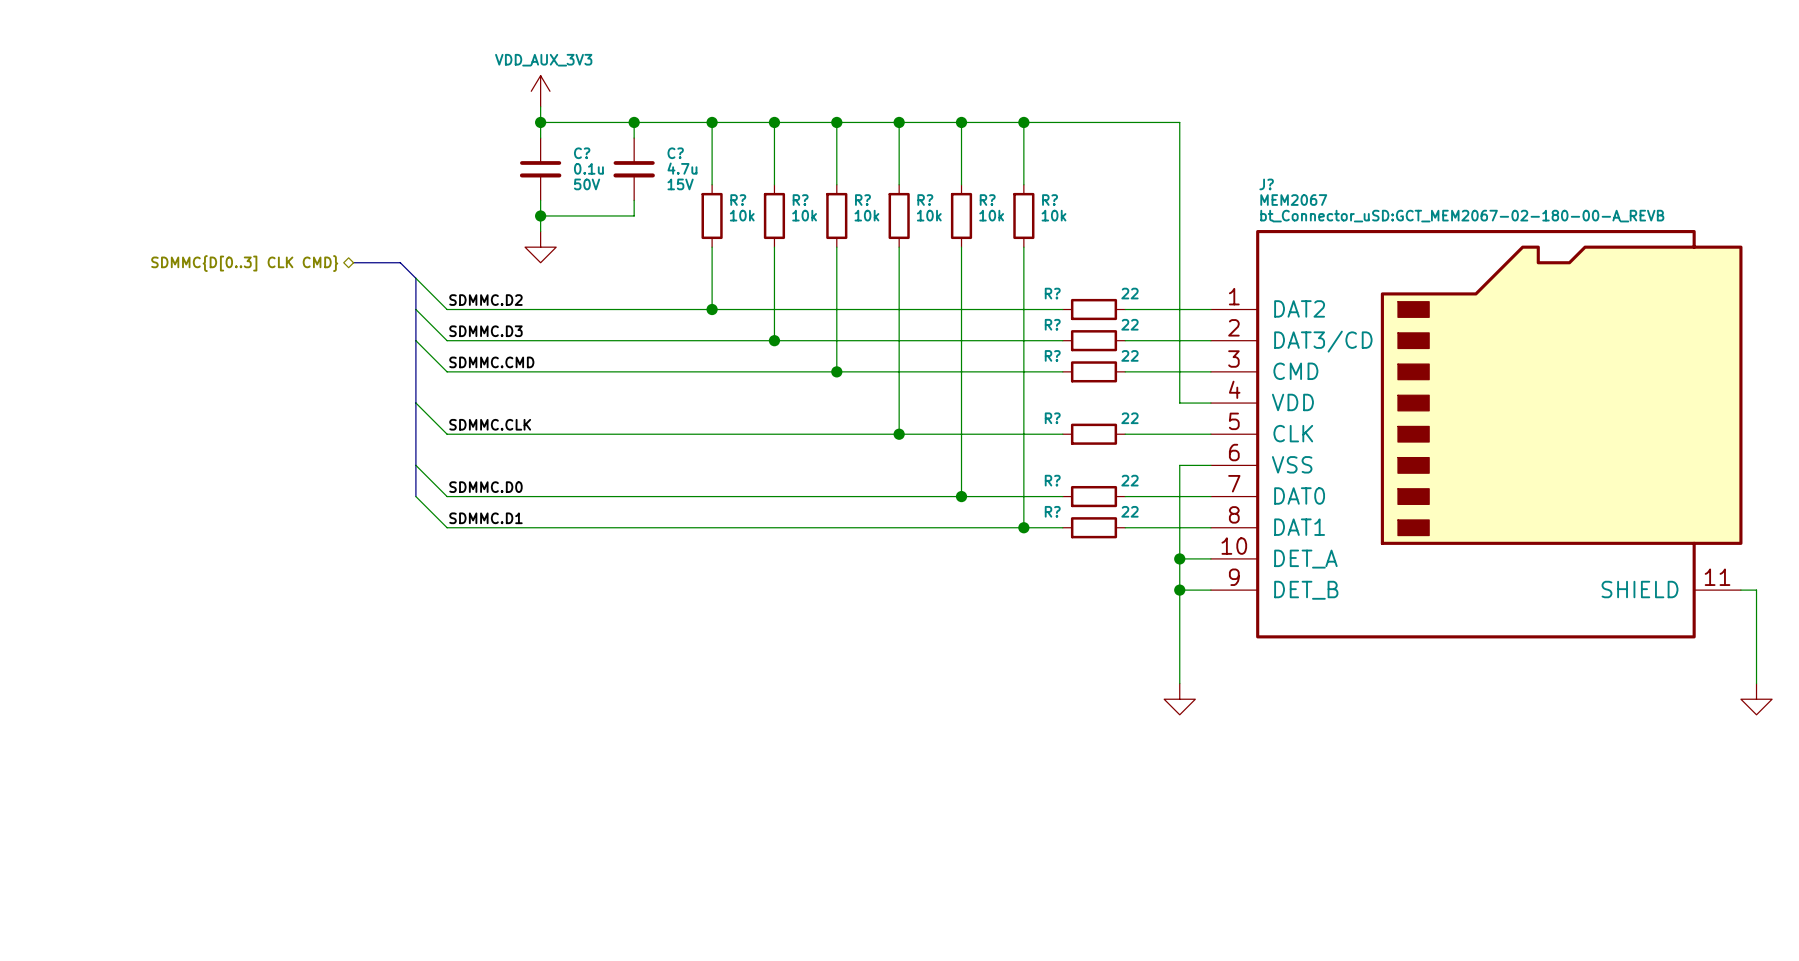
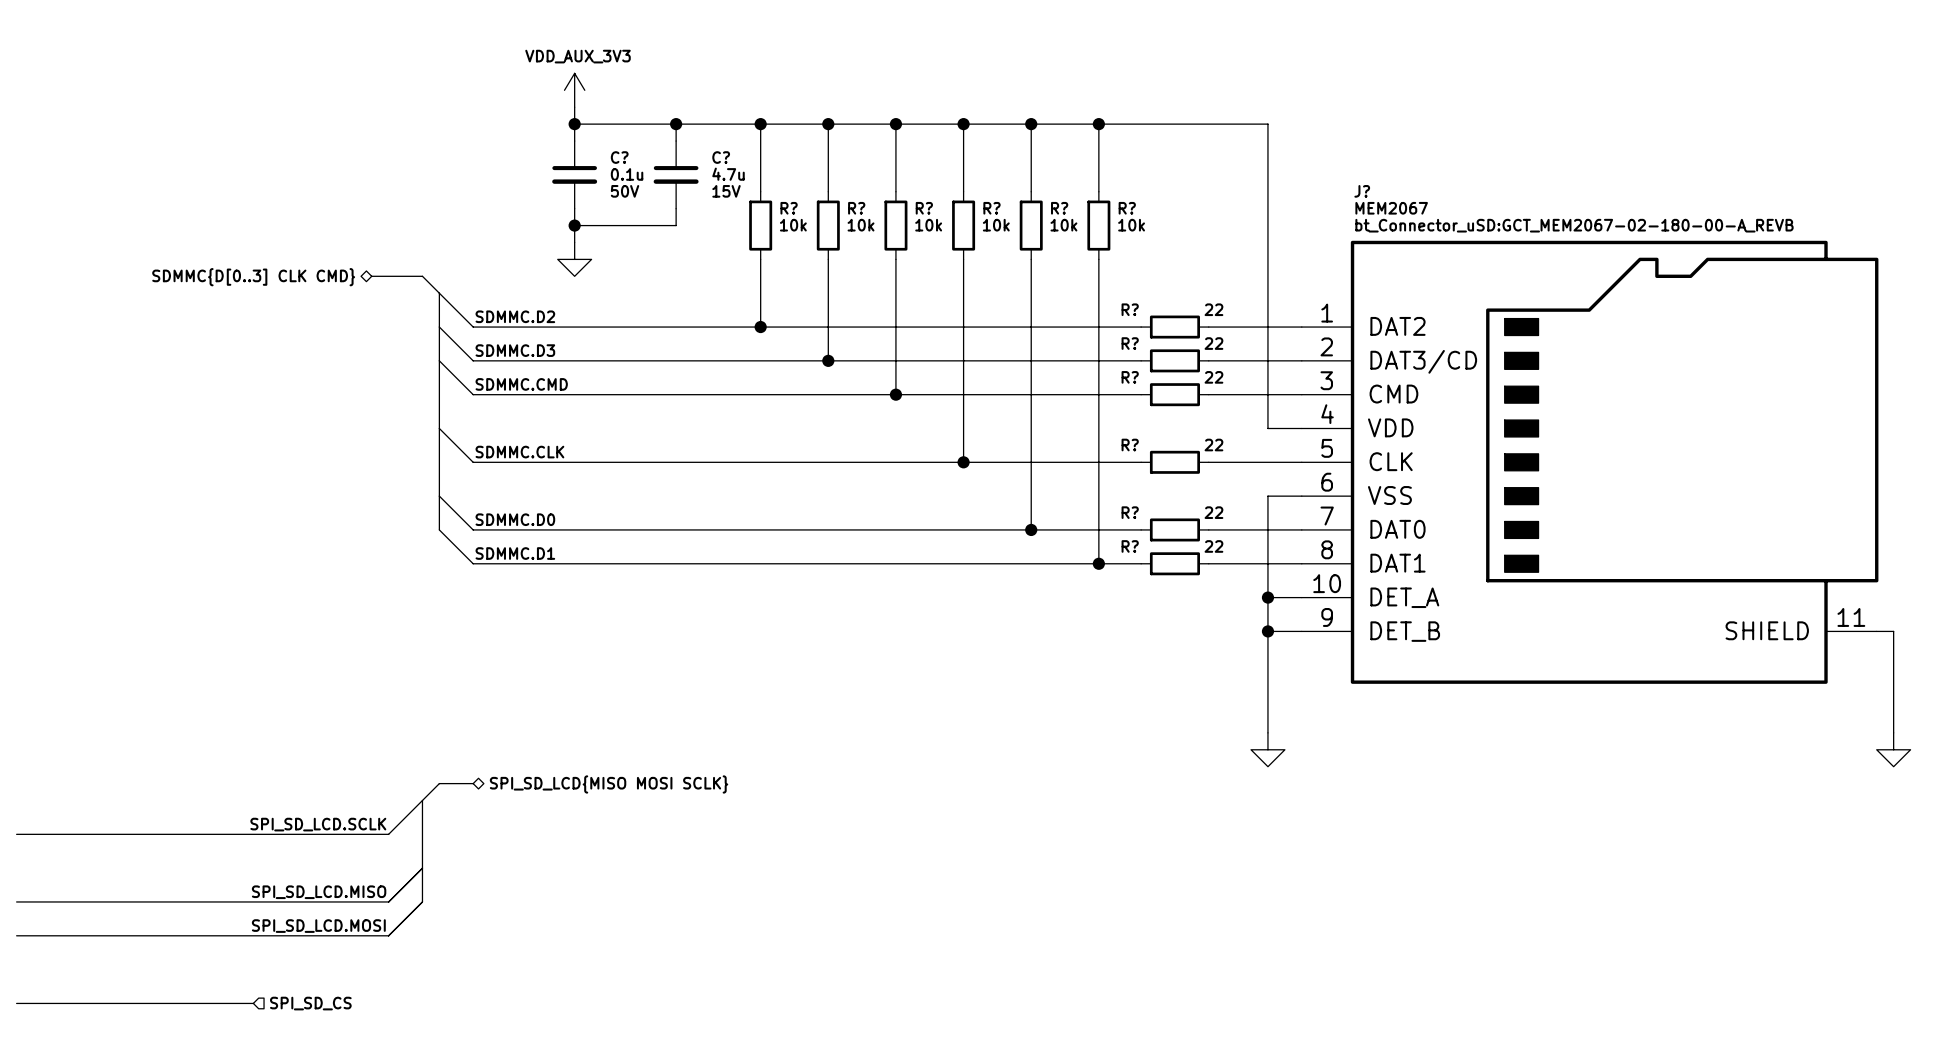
bus: none -> (473, 783) (439, 783) (422, 800) (422, 901)
hierarchical label: none -> SPI_SD_LCD{MISO MOSI SCLK} (609, 784)
wire: none -> (422, 800) (388, 834) (16, 834)
label: none -> SPI_SD_LCD.SCLK (318, 824)
wire: none -> (422, 868) (388, 901) (16, 901)
label: none -> SPI_SD_LCD.MISO (319, 892)
wire: none -> (422, 901) (388, 935) (16, 935)
label: none -> SPI_SD_LCD.MOSI (318, 926)
wire: none -> (16, 1003) (253, 1003)
hierarchical label: none -> SPI_SD_CS (310, 1003)

